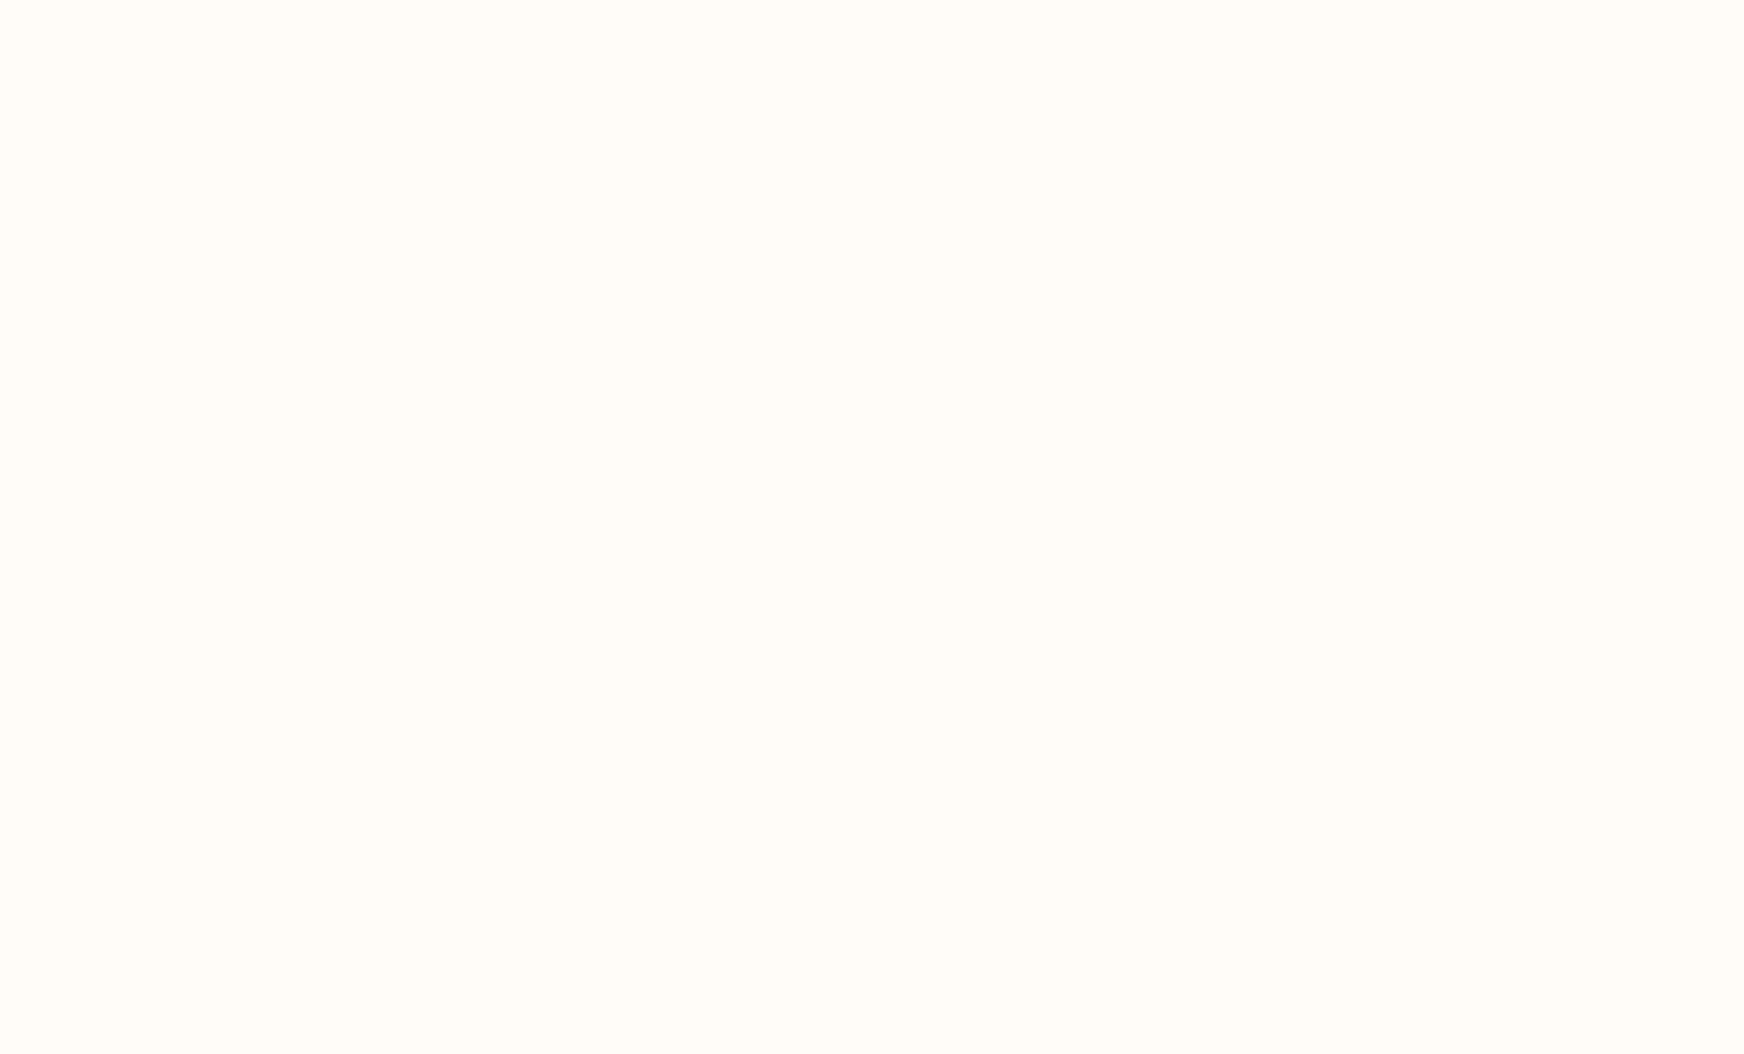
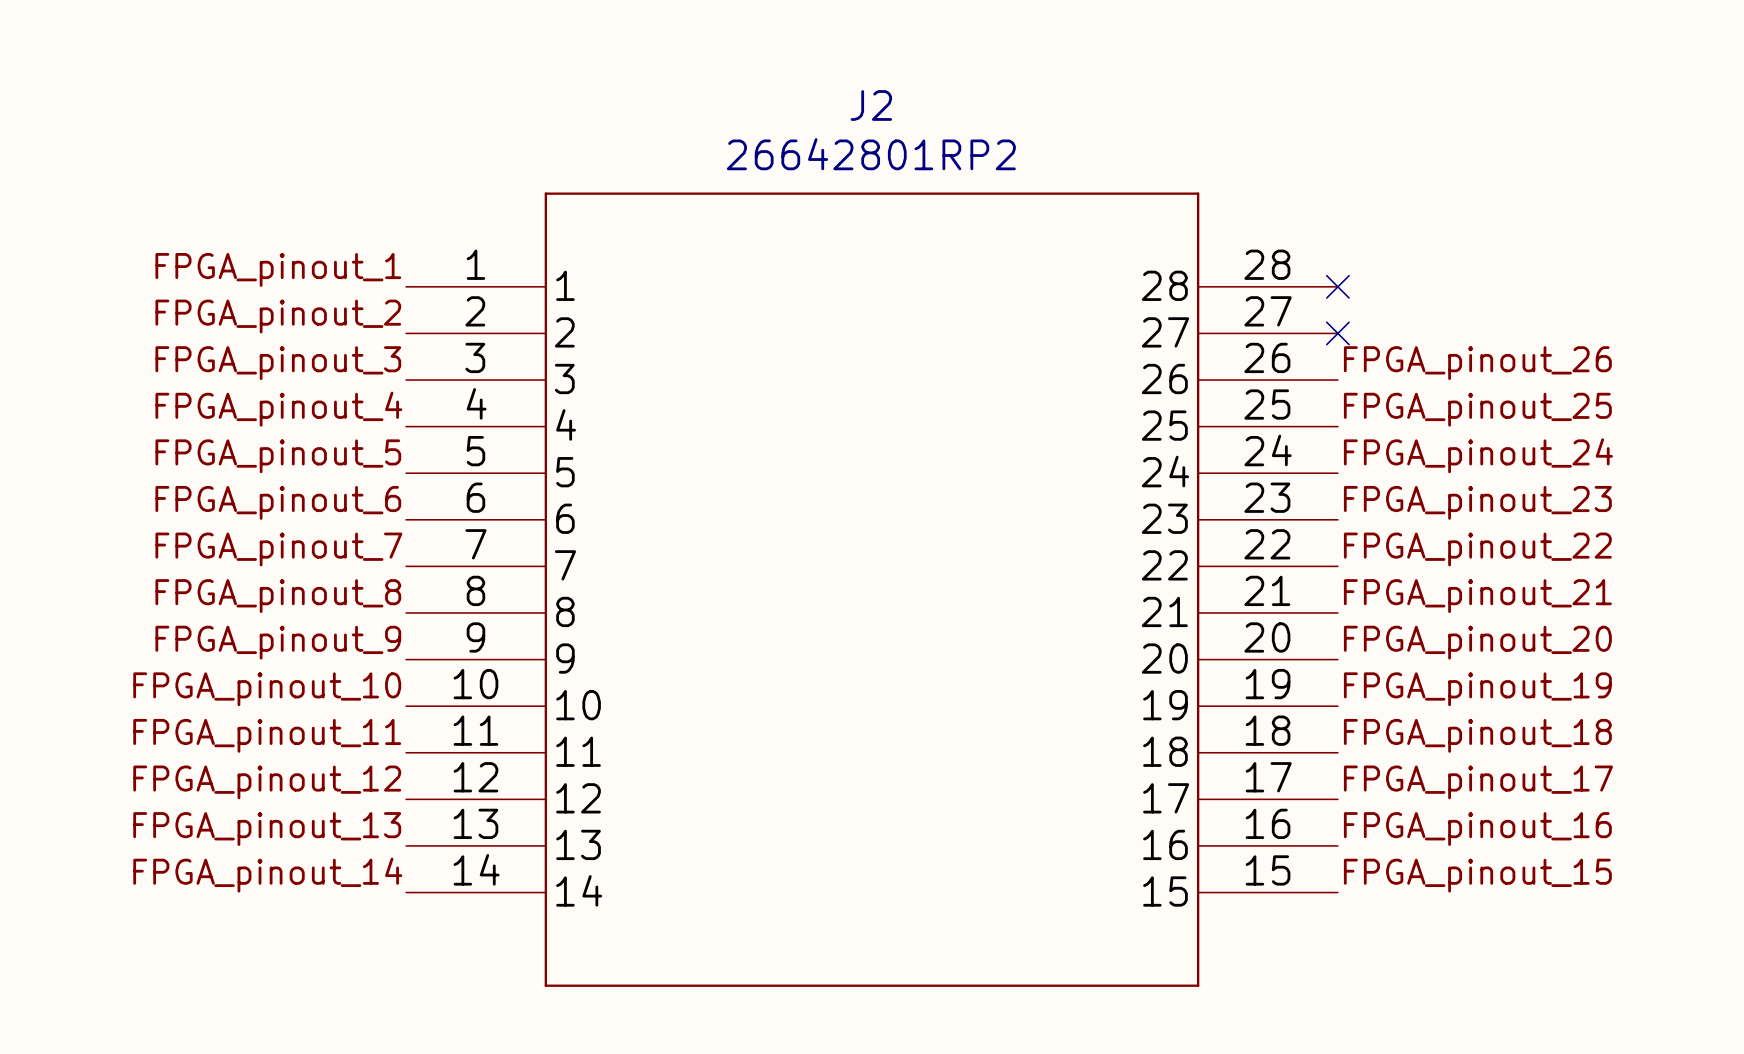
label: none -> FPGA_pinout_1 (278, 269)
no-connect mark: none -> (1337, 286)
label: none -> FPGA_pinout_2 (278, 316)
no-connect mark: none -> (1337, 333)
label: none -> FPGA_pinout_3 (278, 363)
label: none -> FPGA_pinout_26 (1477, 363)
label: none -> FPGA_pinout_4 (278, 409)
label: none -> FPGA_pinout_25 (1477, 409)
label: none -> FPGA_pinout_24 (1478, 455)
label: none -> FPGA_pinout_5 (278, 456)
label: none -> FPGA_pinout_6 (278, 502)
label: none -> FPGA_pinout_23 (1477, 502)
label: none -> FPGA_pinout_7 (278, 549)
label: none -> FPGA_pinout_22 (1477, 549)
J2: none -> 26642801RP2 (871, 589)
label: none -> FPGA_pinout_8 (278, 596)
label: none -> FPGA_pinout_21 (1477, 596)
label: none -> FPGA_pinout_9 (278, 642)
label: none -> FPGA_pinout_20 (1477, 642)
label: none -> FPGA_pinout_10 (267, 689)
label: none -> FPGA_pinout_19 (1477, 689)
label: none -> FPGA_pinout_11 (267, 735)
label: none -> FPGA_pinout_18 (1477, 735)
label: none -> FPGA_pinout_12 (267, 782)
label: none -> FPGA_pinout_17 (1478, 782)
label: none -> FPGA_pinout_13 (267, 829)
label: none -> FPGA_pinout_16 (1477, 829)
label: none -> FPGA_pinout_14 (267, 875)
label: none -> FPGA_pinout_15 (1477, 875)

